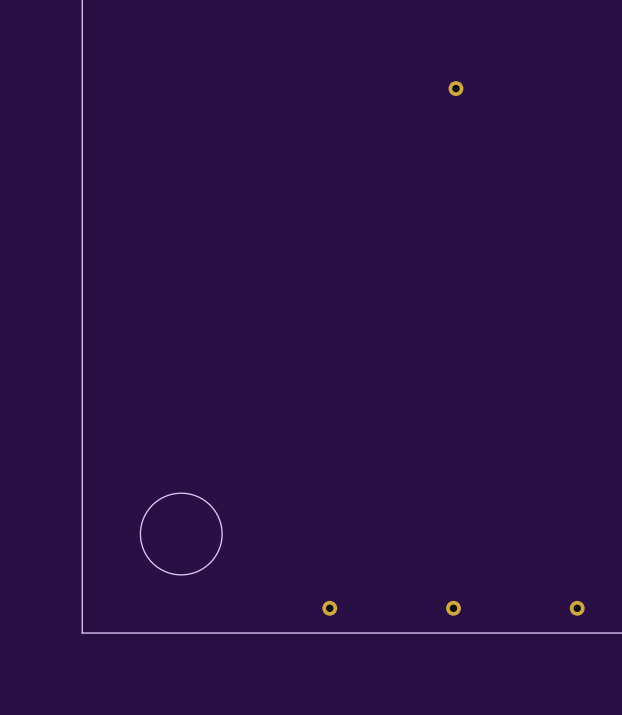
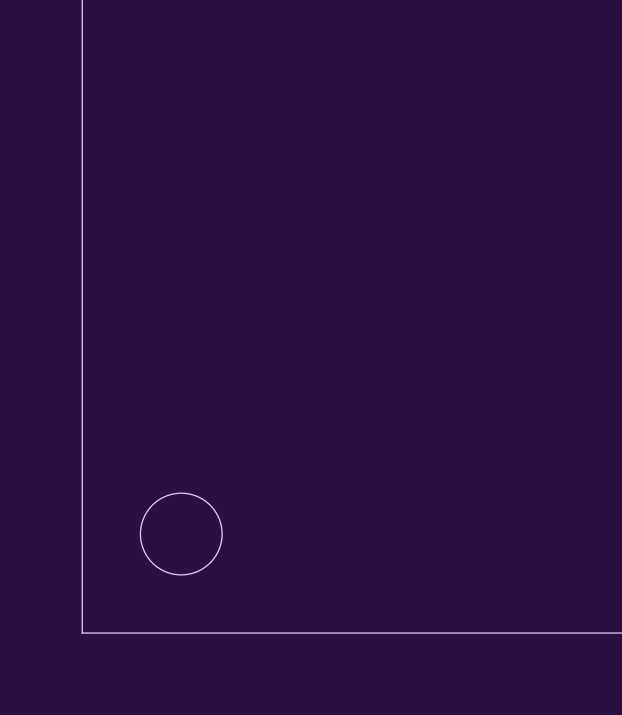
via: (455, 88) -> none
via: (329, 608) -> none
via: (453, 608) -> none
via: (577, 608) -> none

